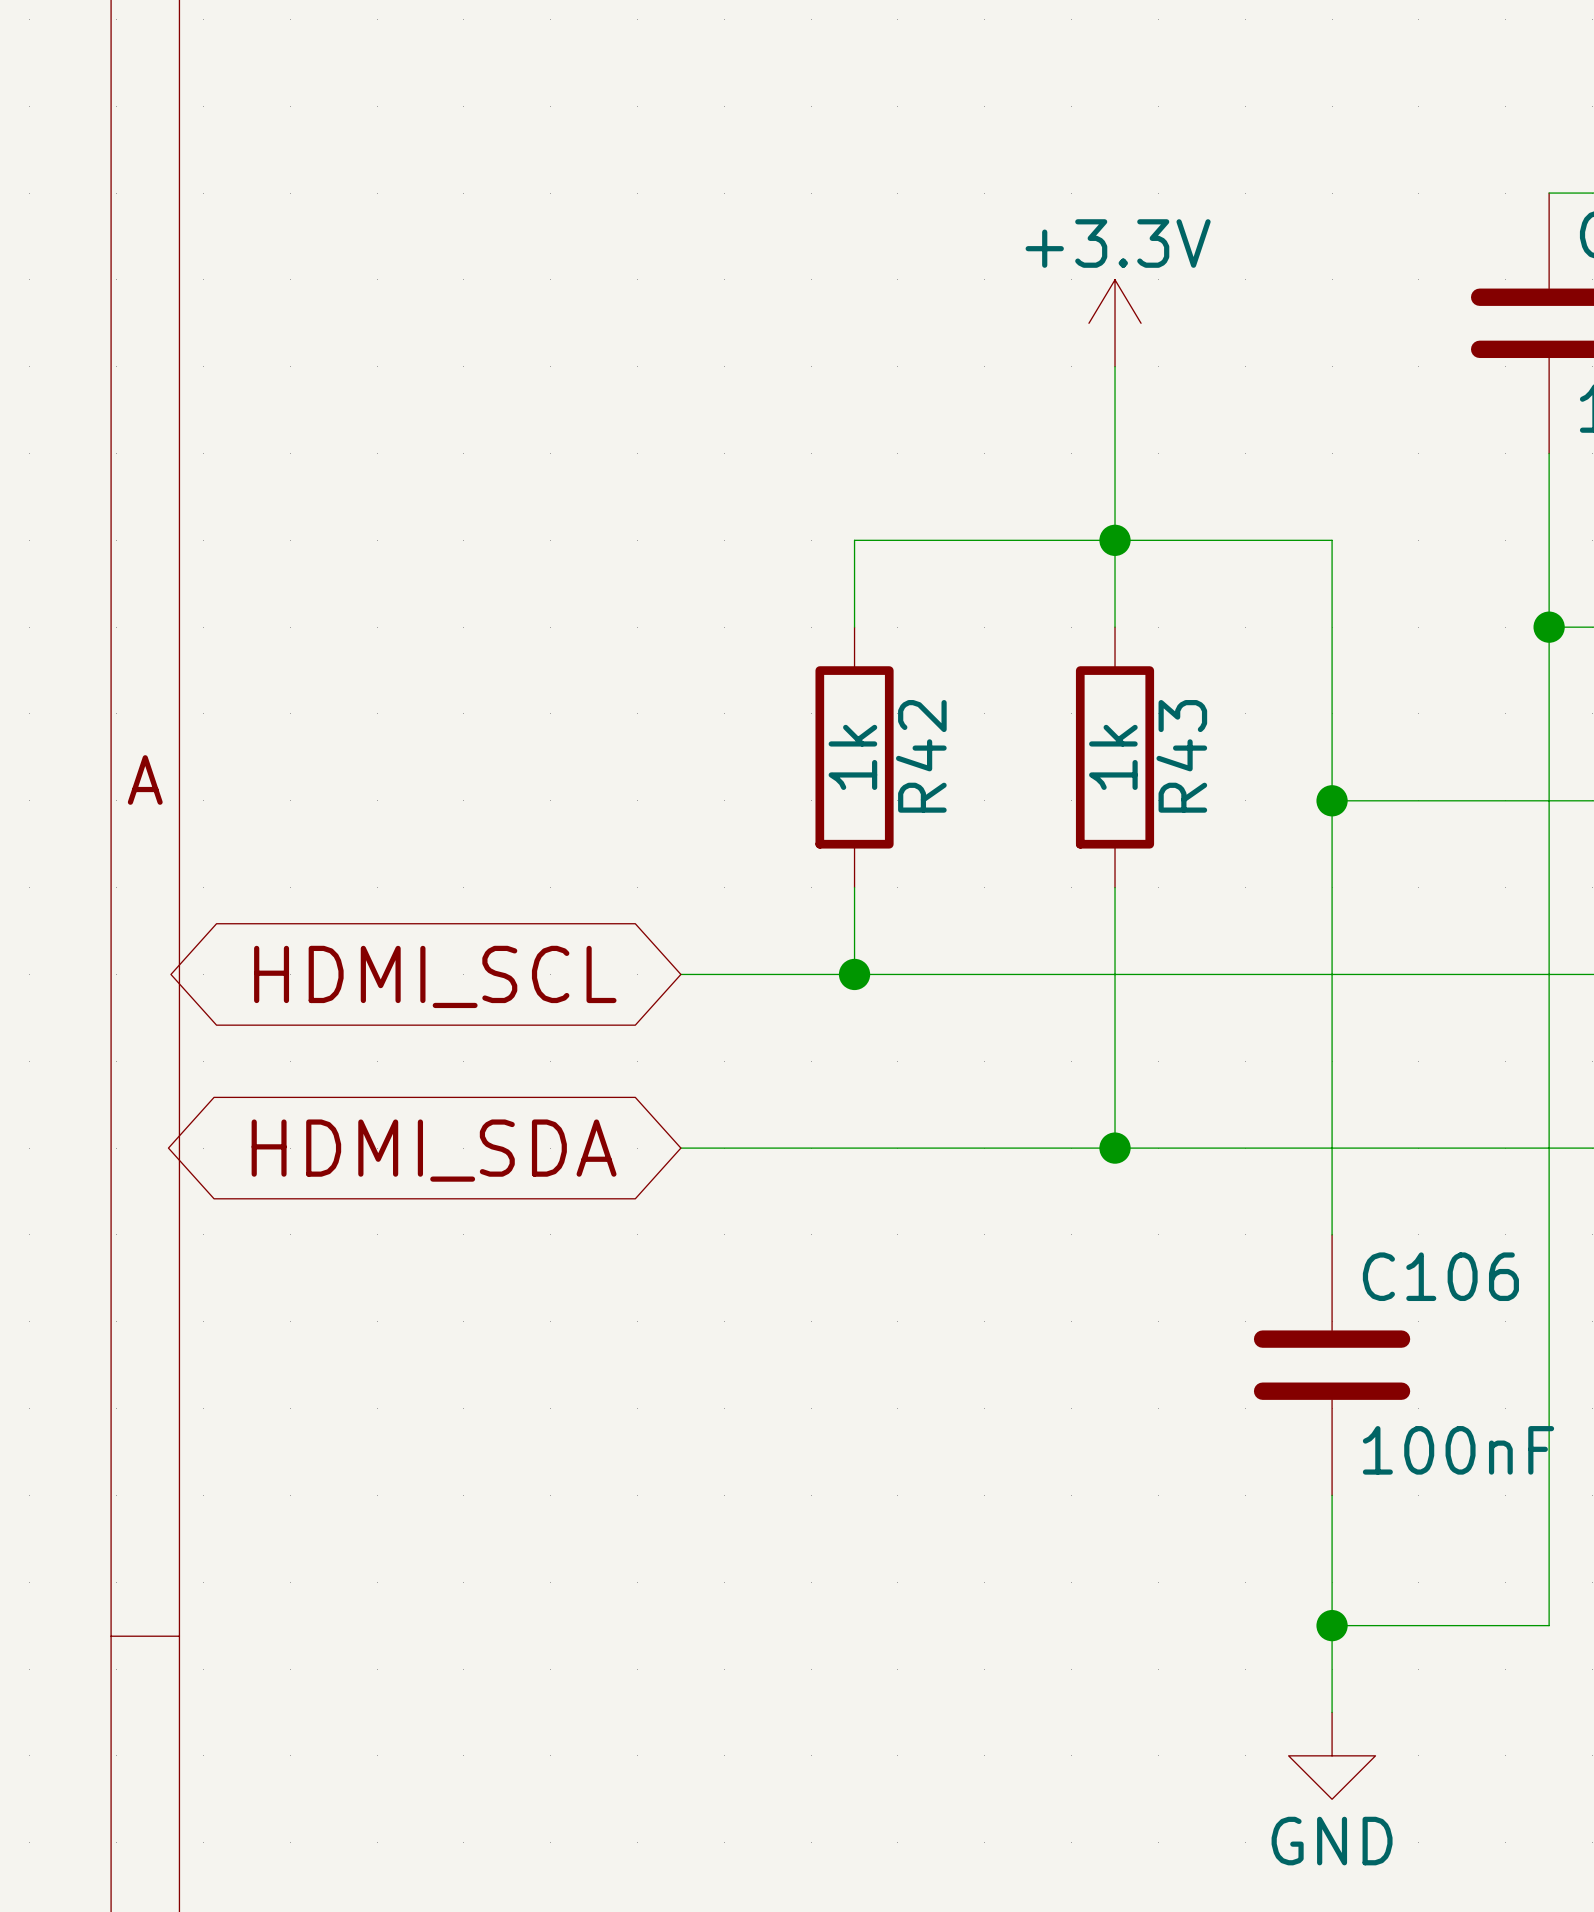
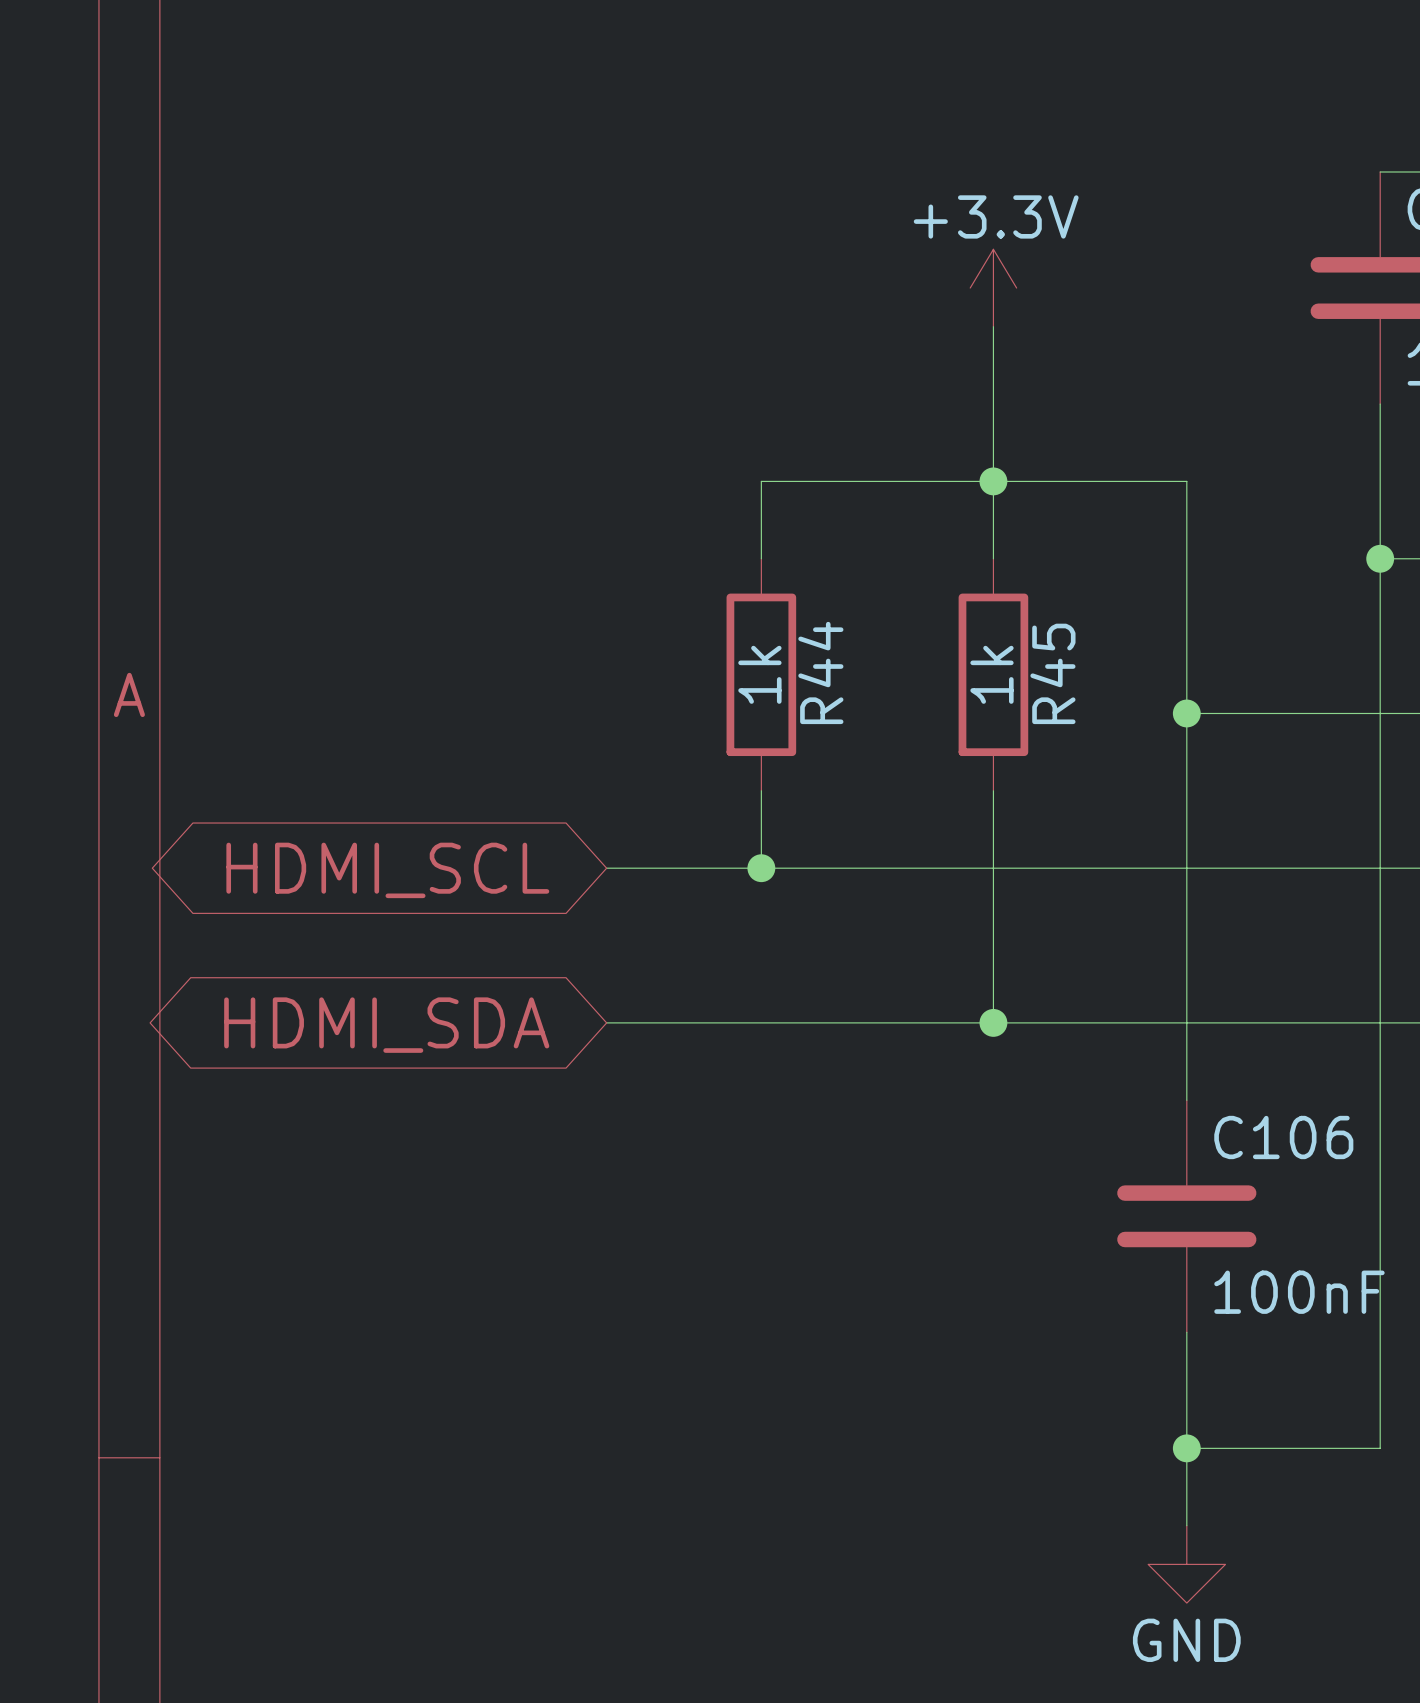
R42 name: R42 (921, 756) -> R44 (820, 672)
R43 name: R43 (1181, 756) -> R45 (1052, 673)

